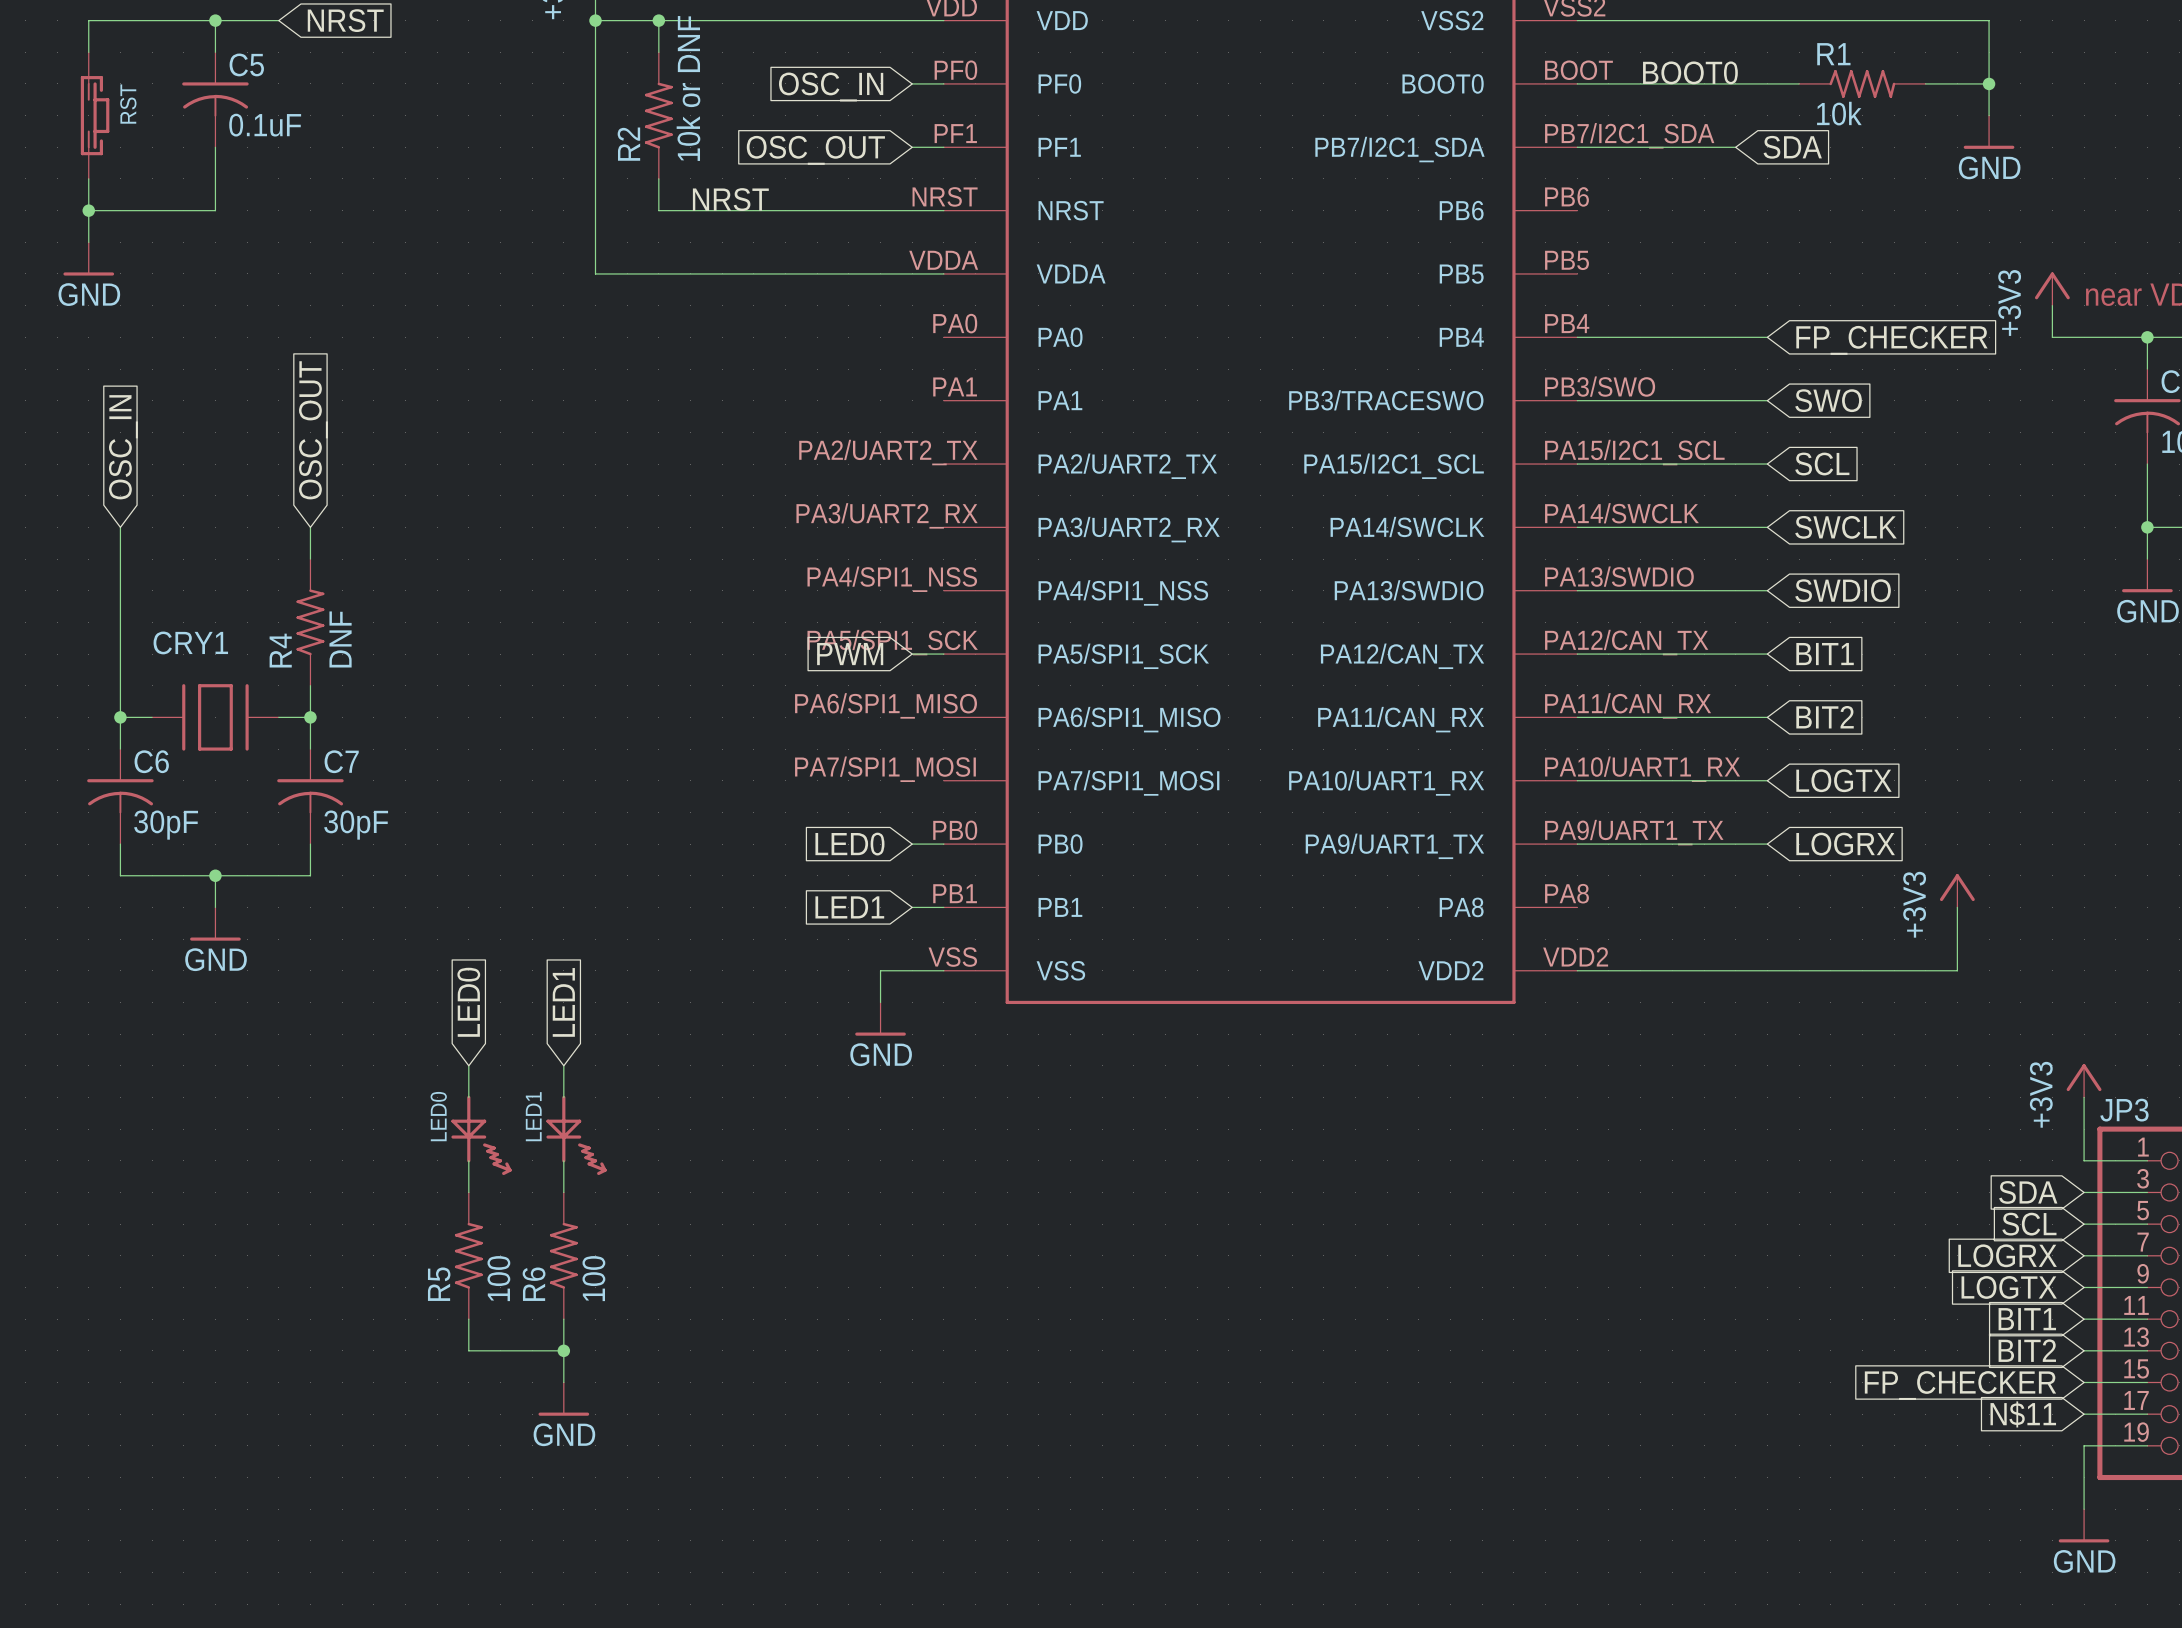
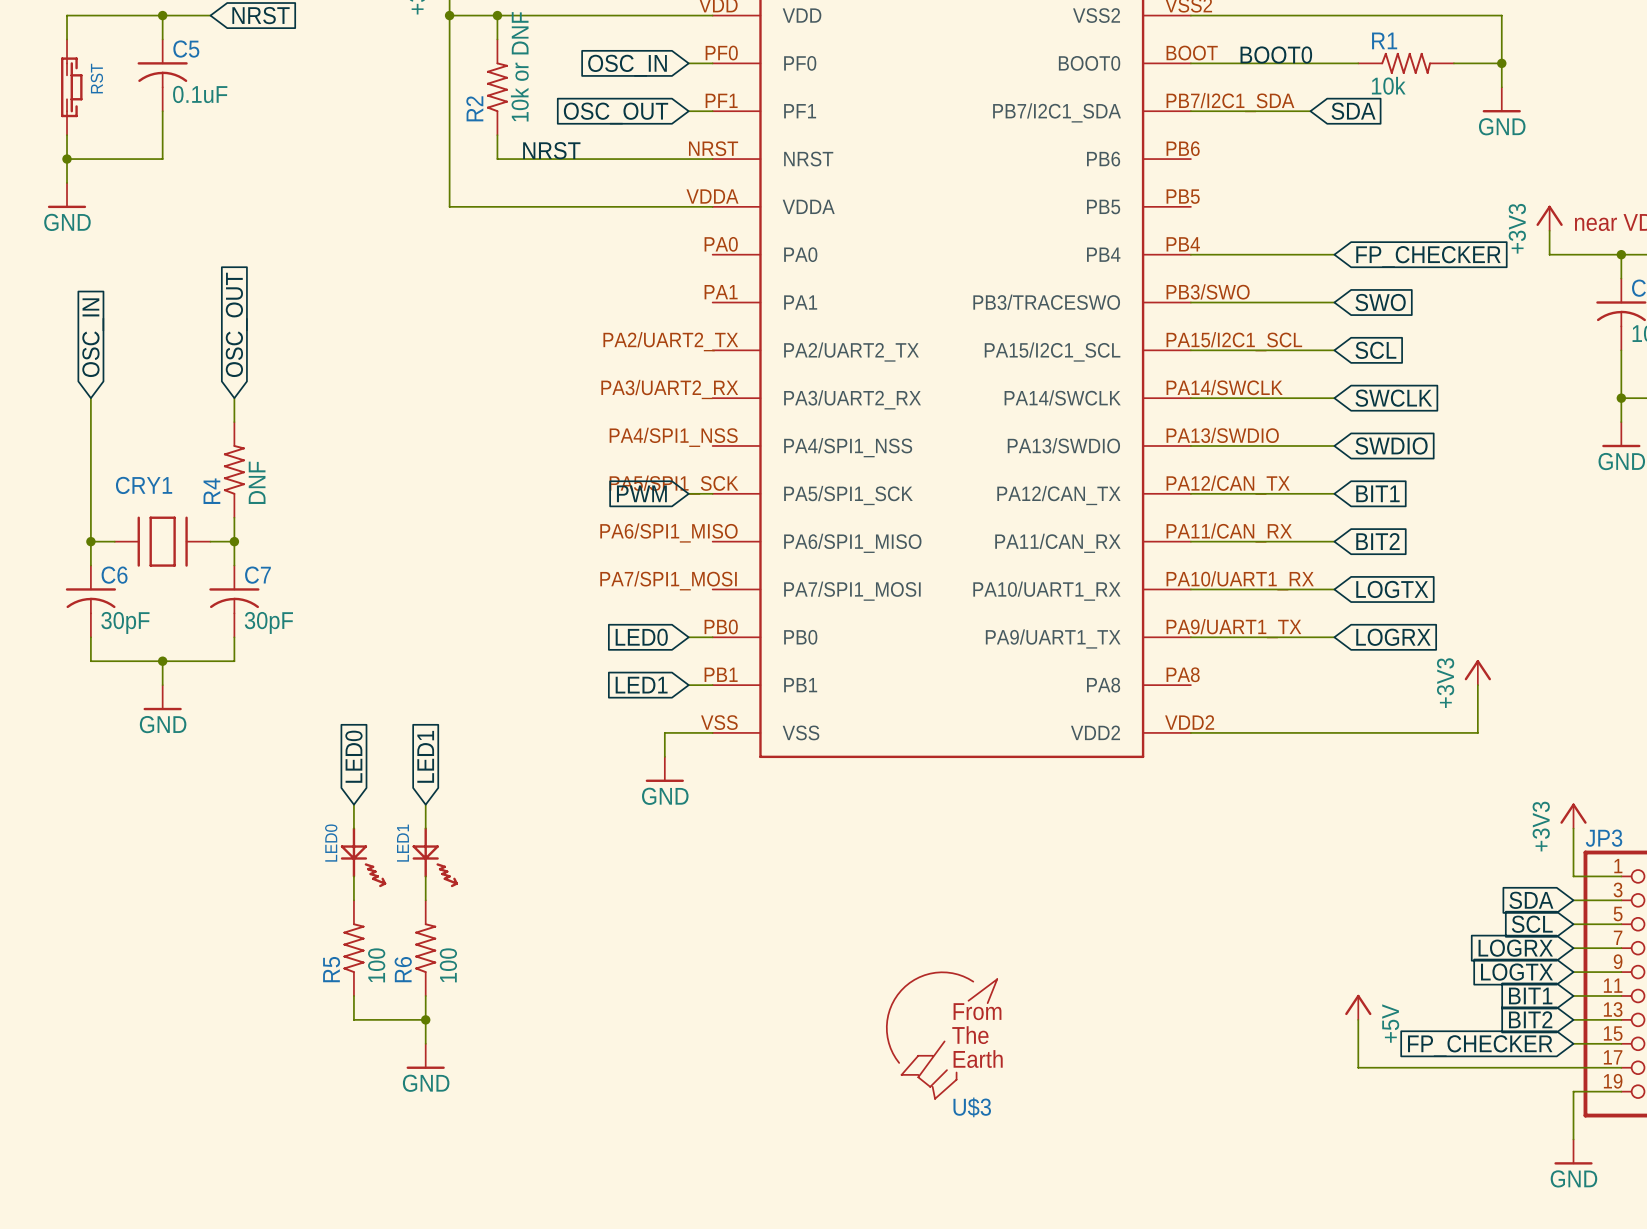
power symbol: none -> +5V (1358, 1007)
wire: none -> (1358, 1019) (1358, 1067) (1573, 1067)
U$3: none -> (942, 1035)
global label: N$11 (2023, 1414) -> none

